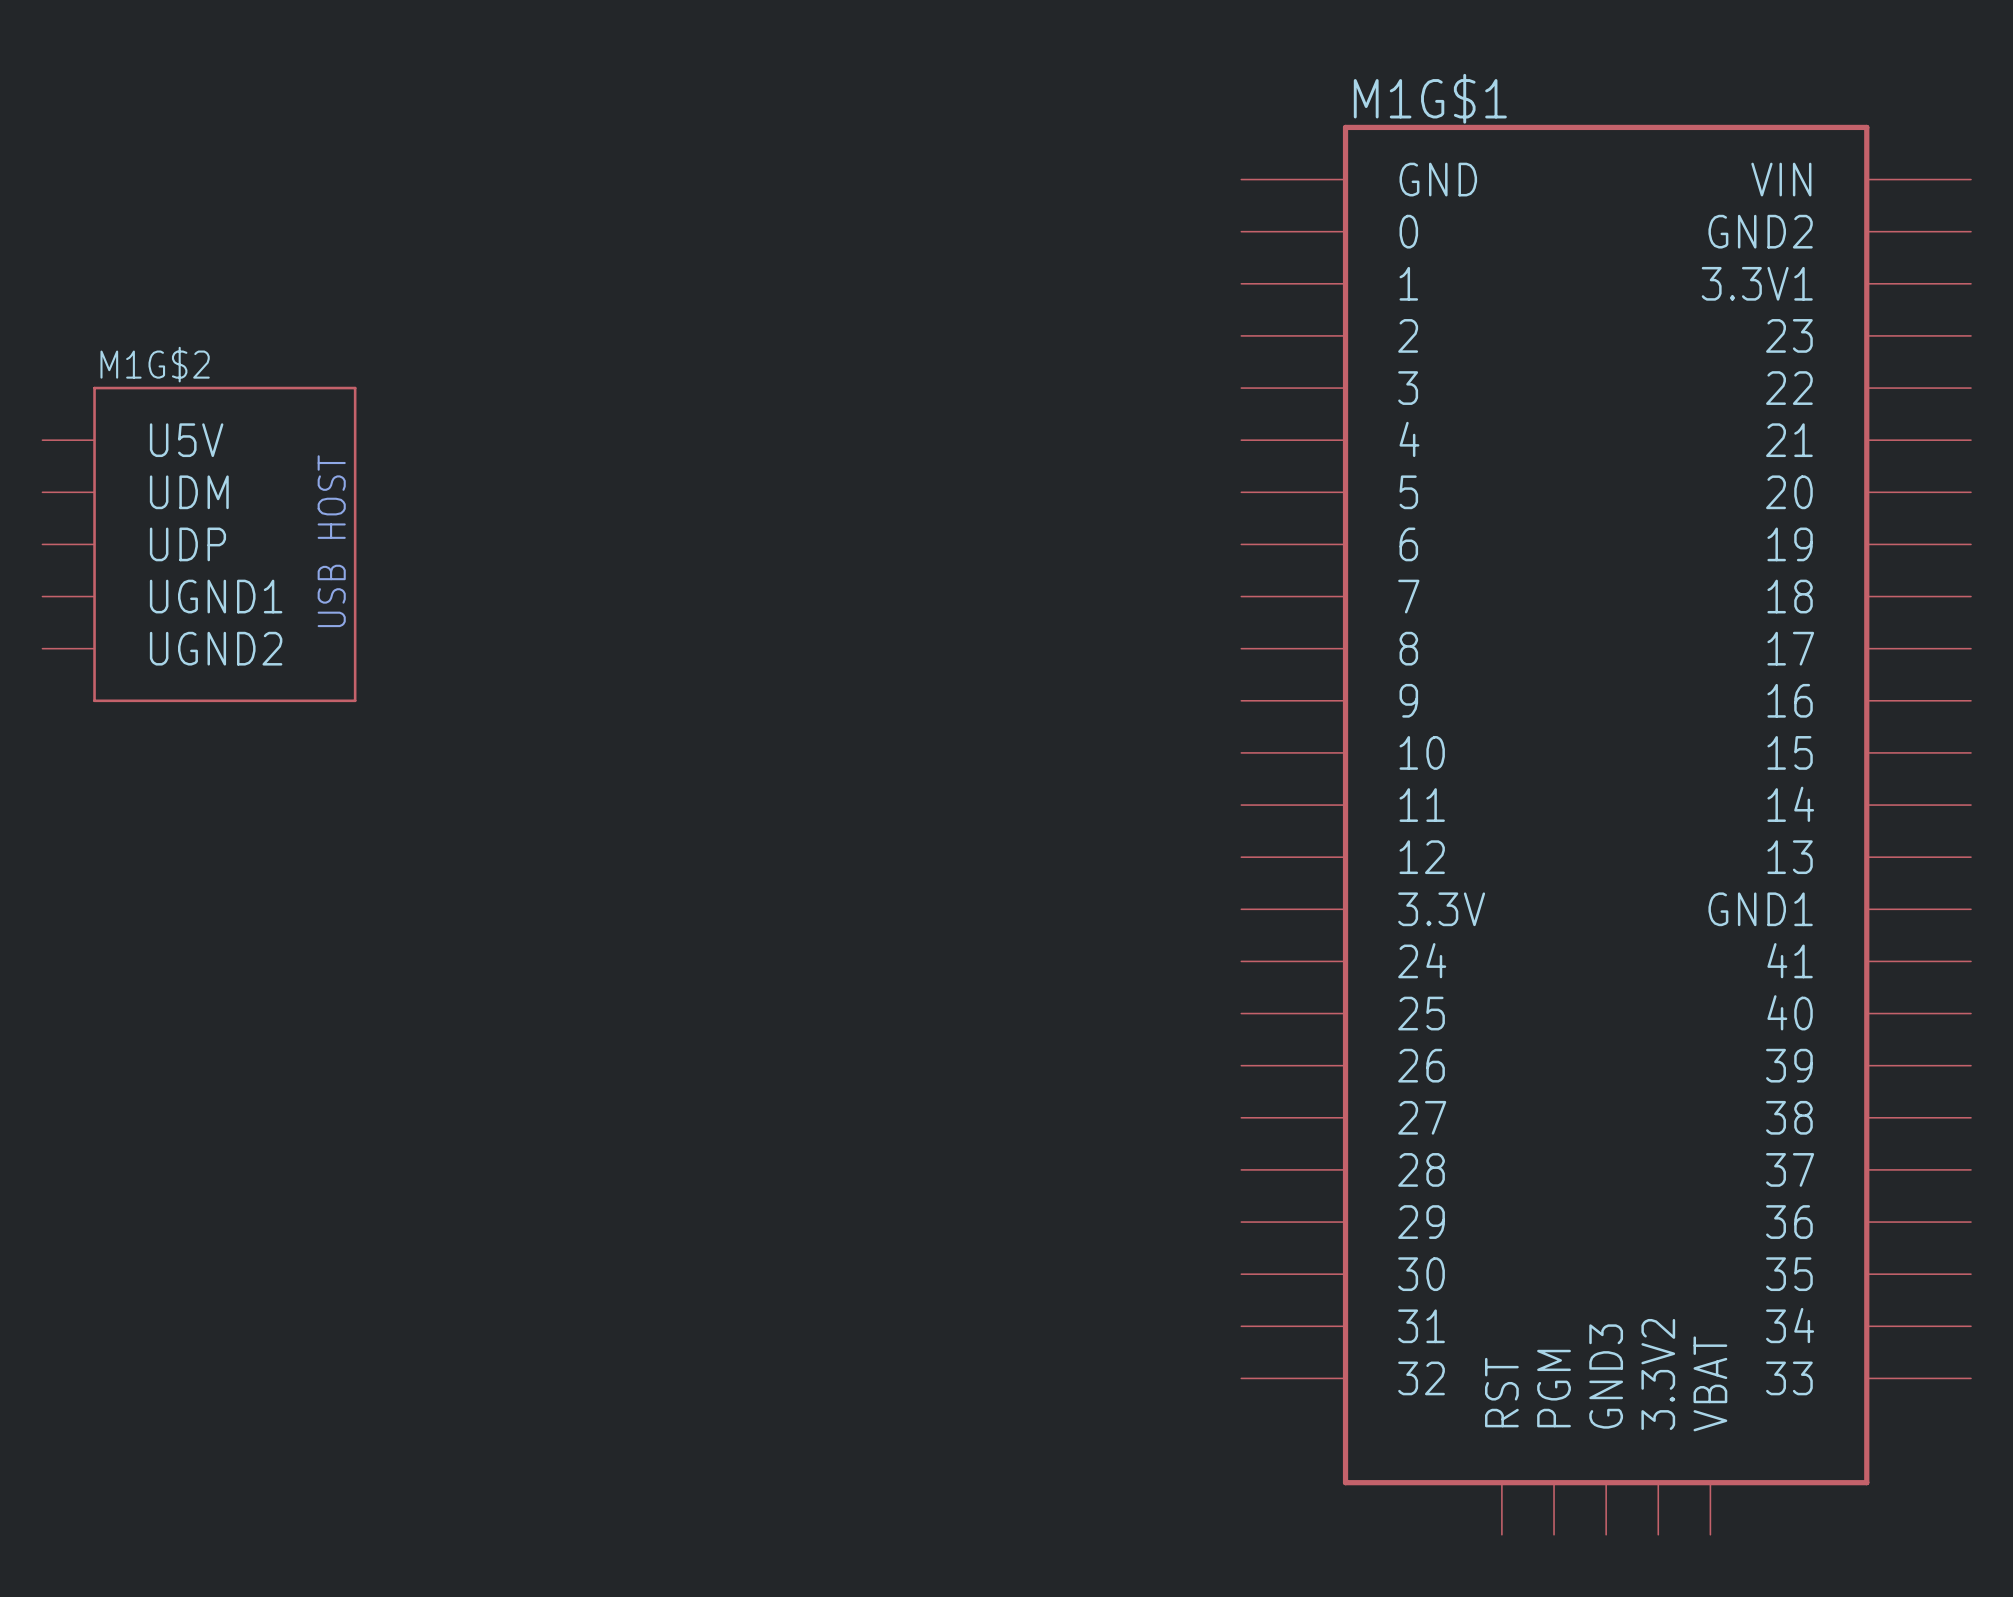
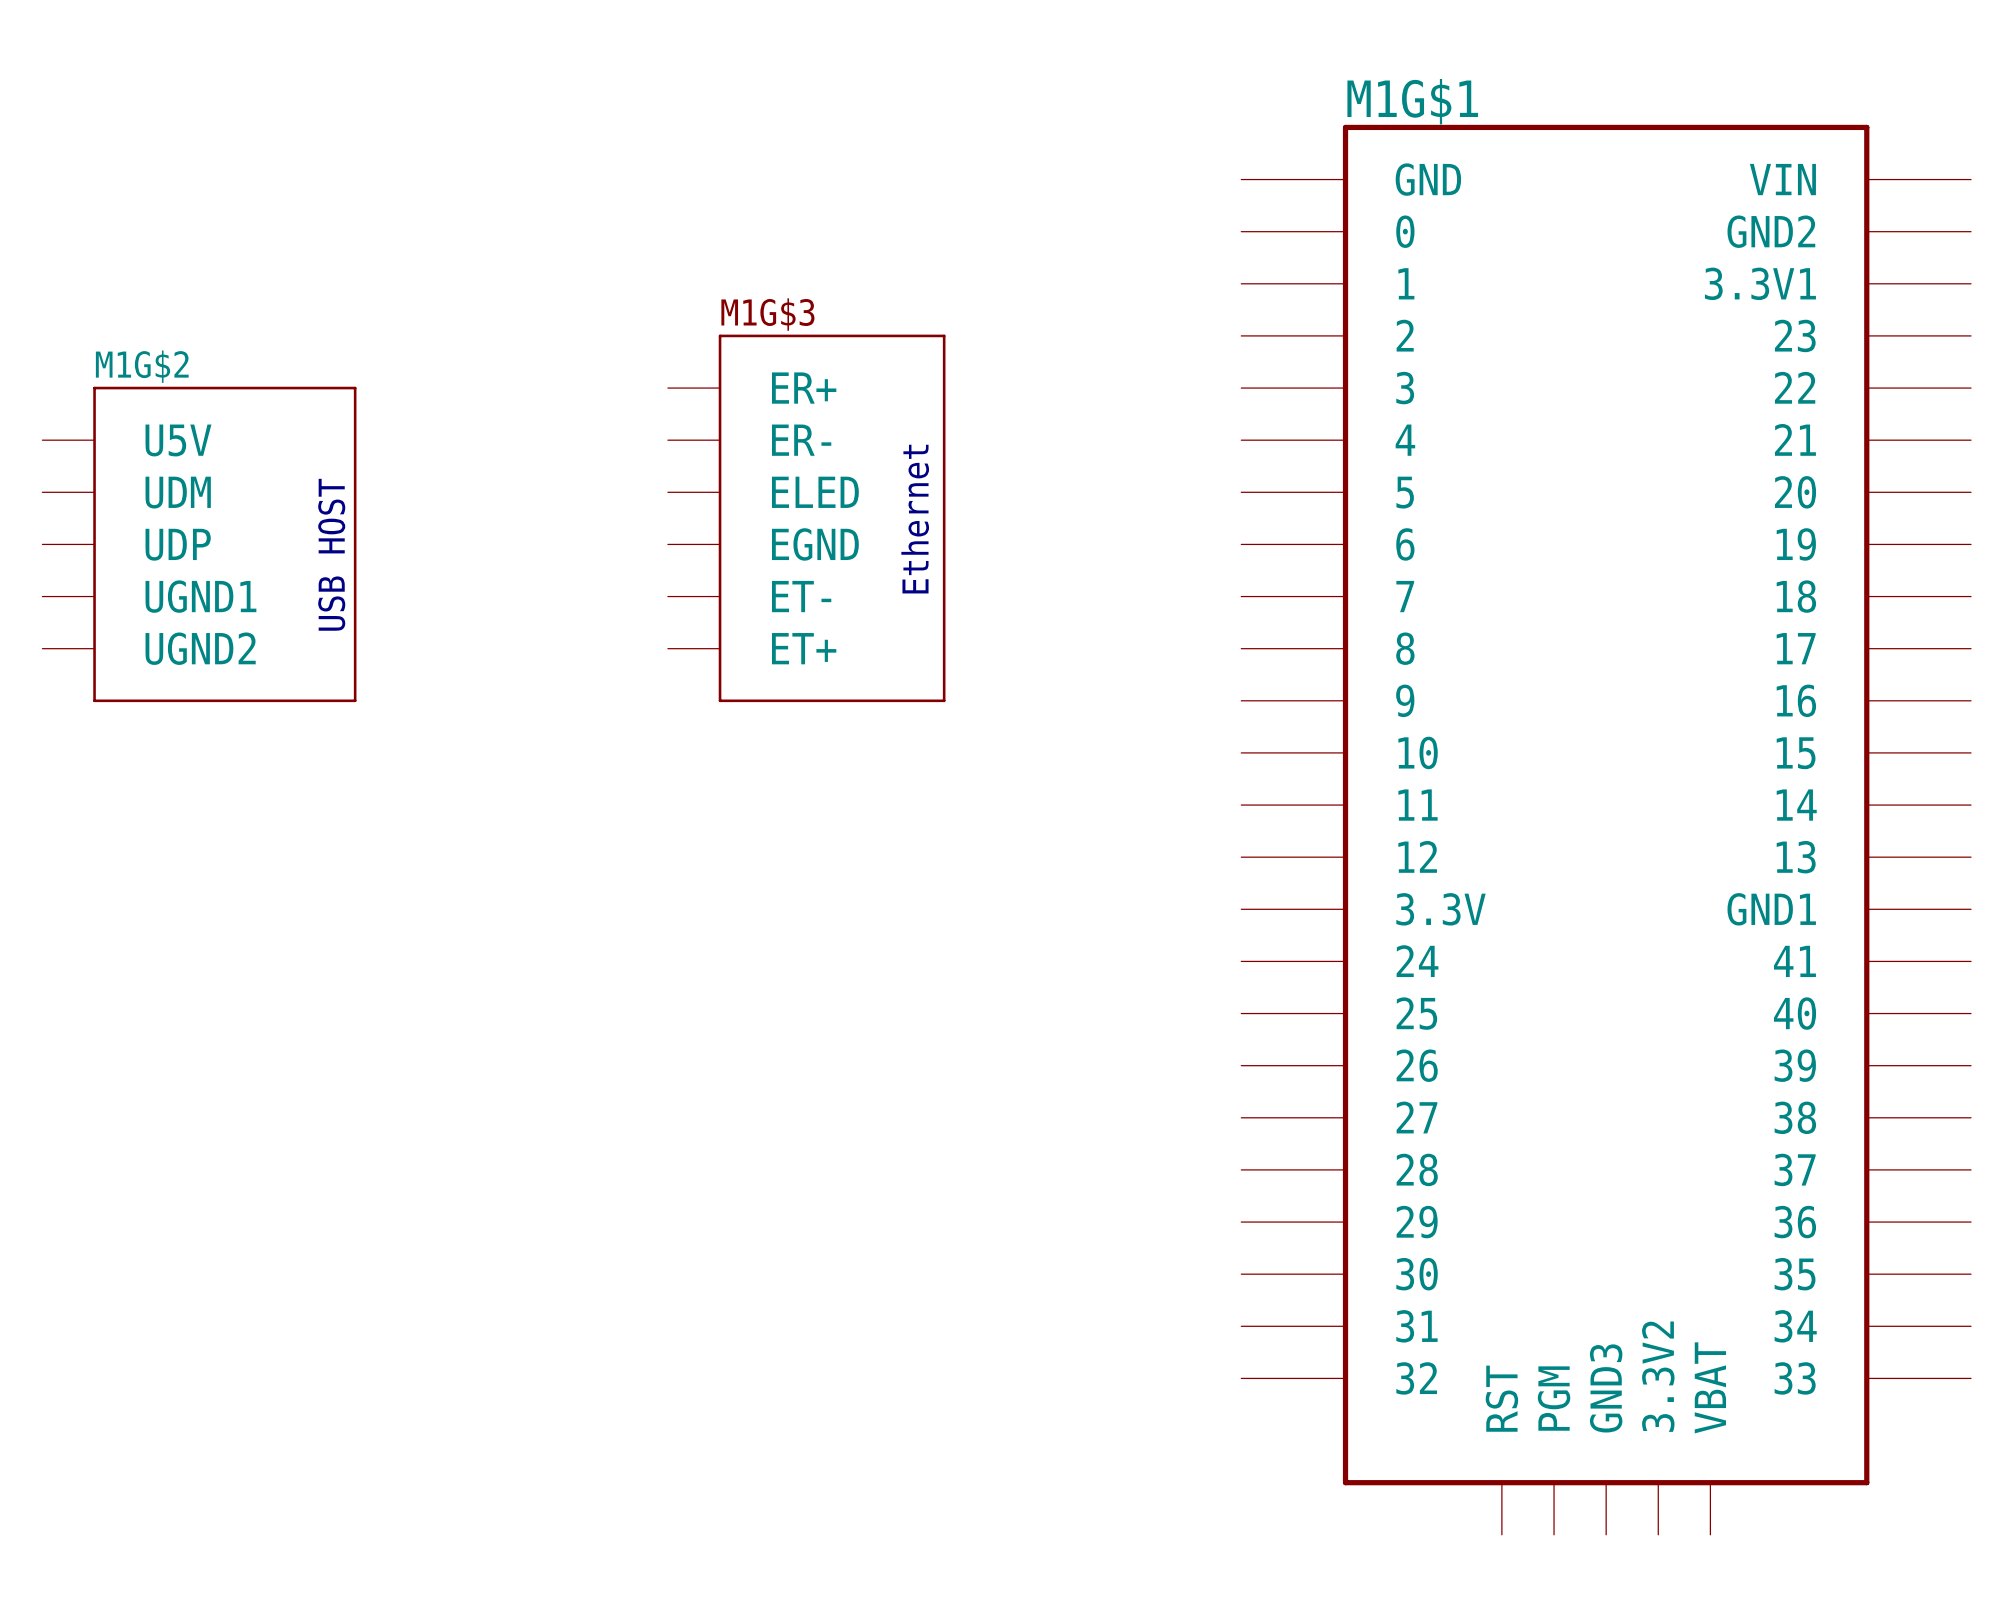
M1G$3: none -> (806, 518)

